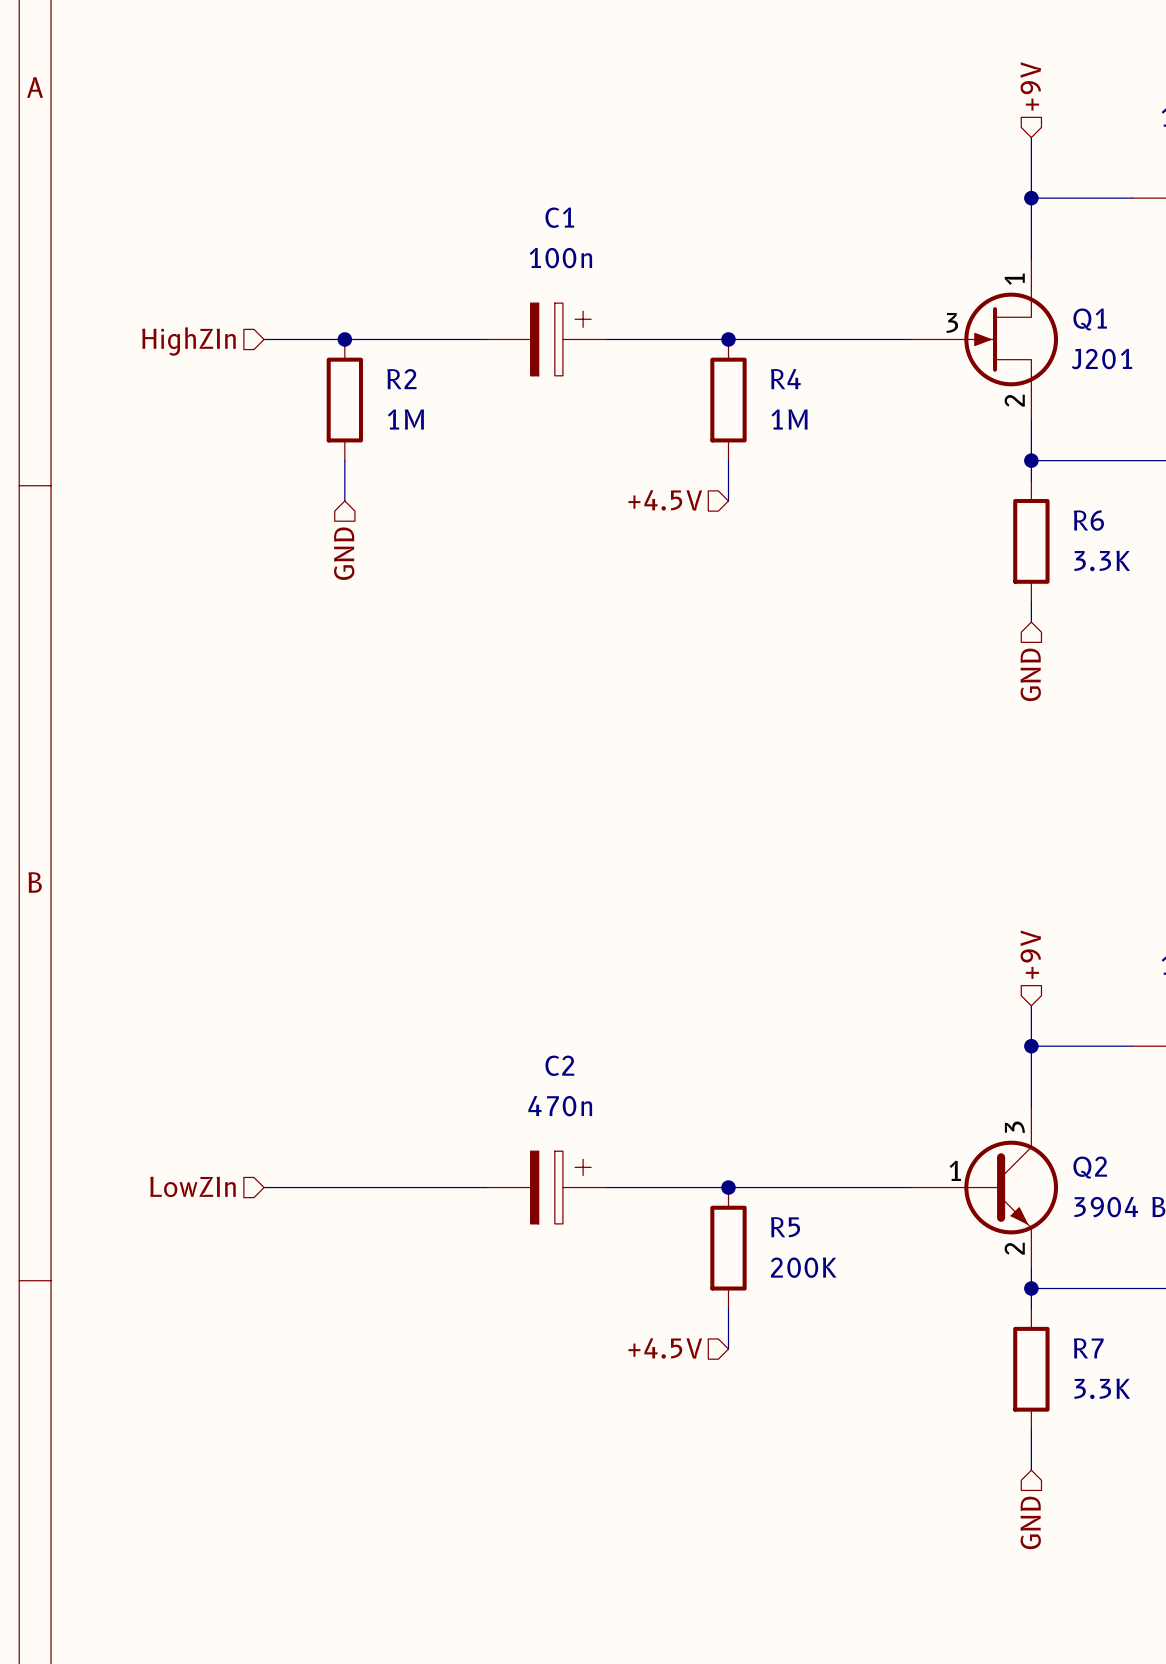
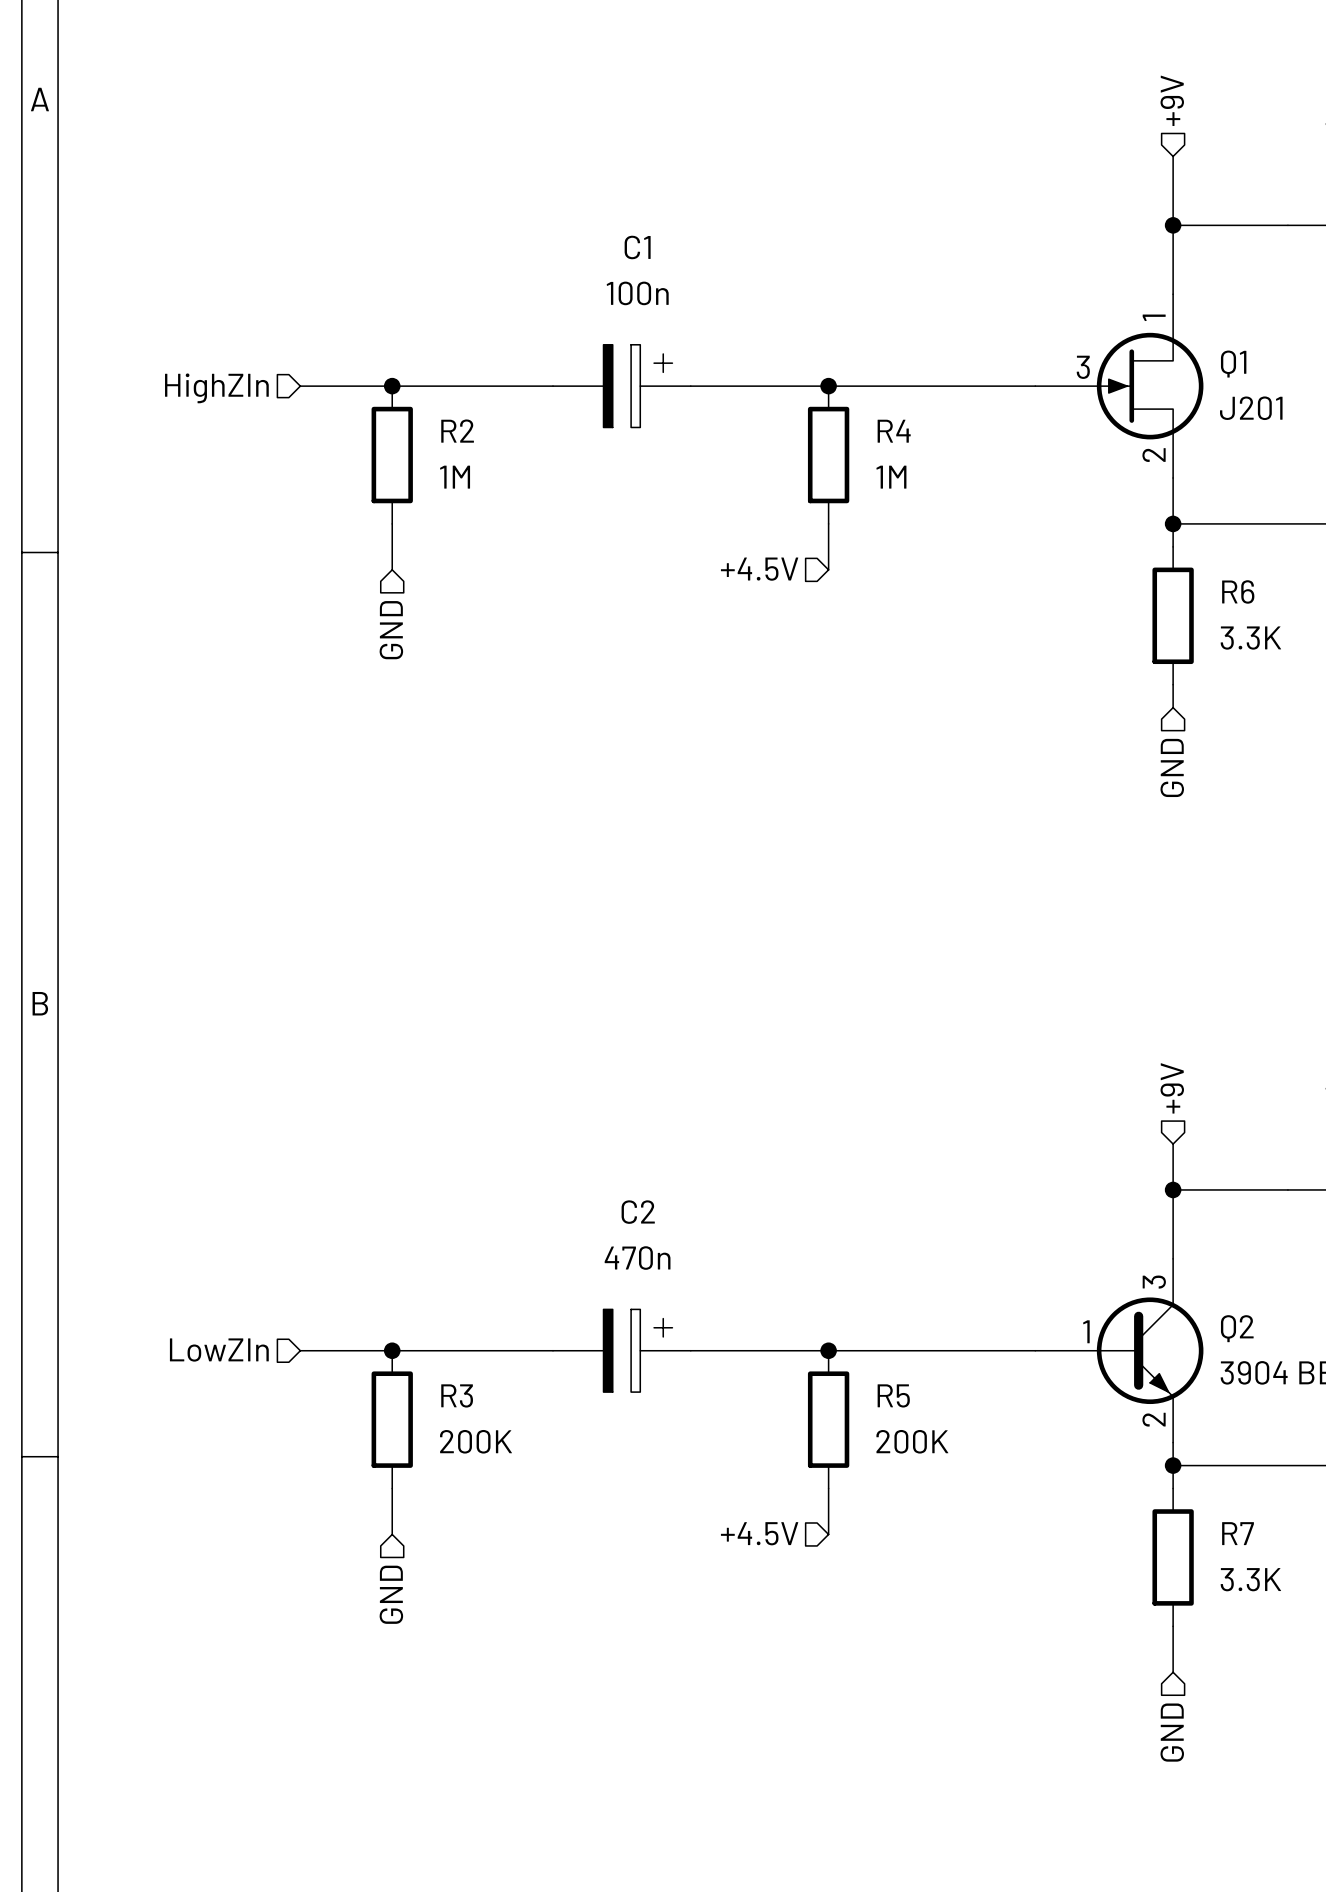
junction: none -> (392, 1350)
R3: none -> 200K (392, 1419)
wire: none -> (392, 1488) (392, 1534)
hierarchical label: none -> GND (391, 1594)

